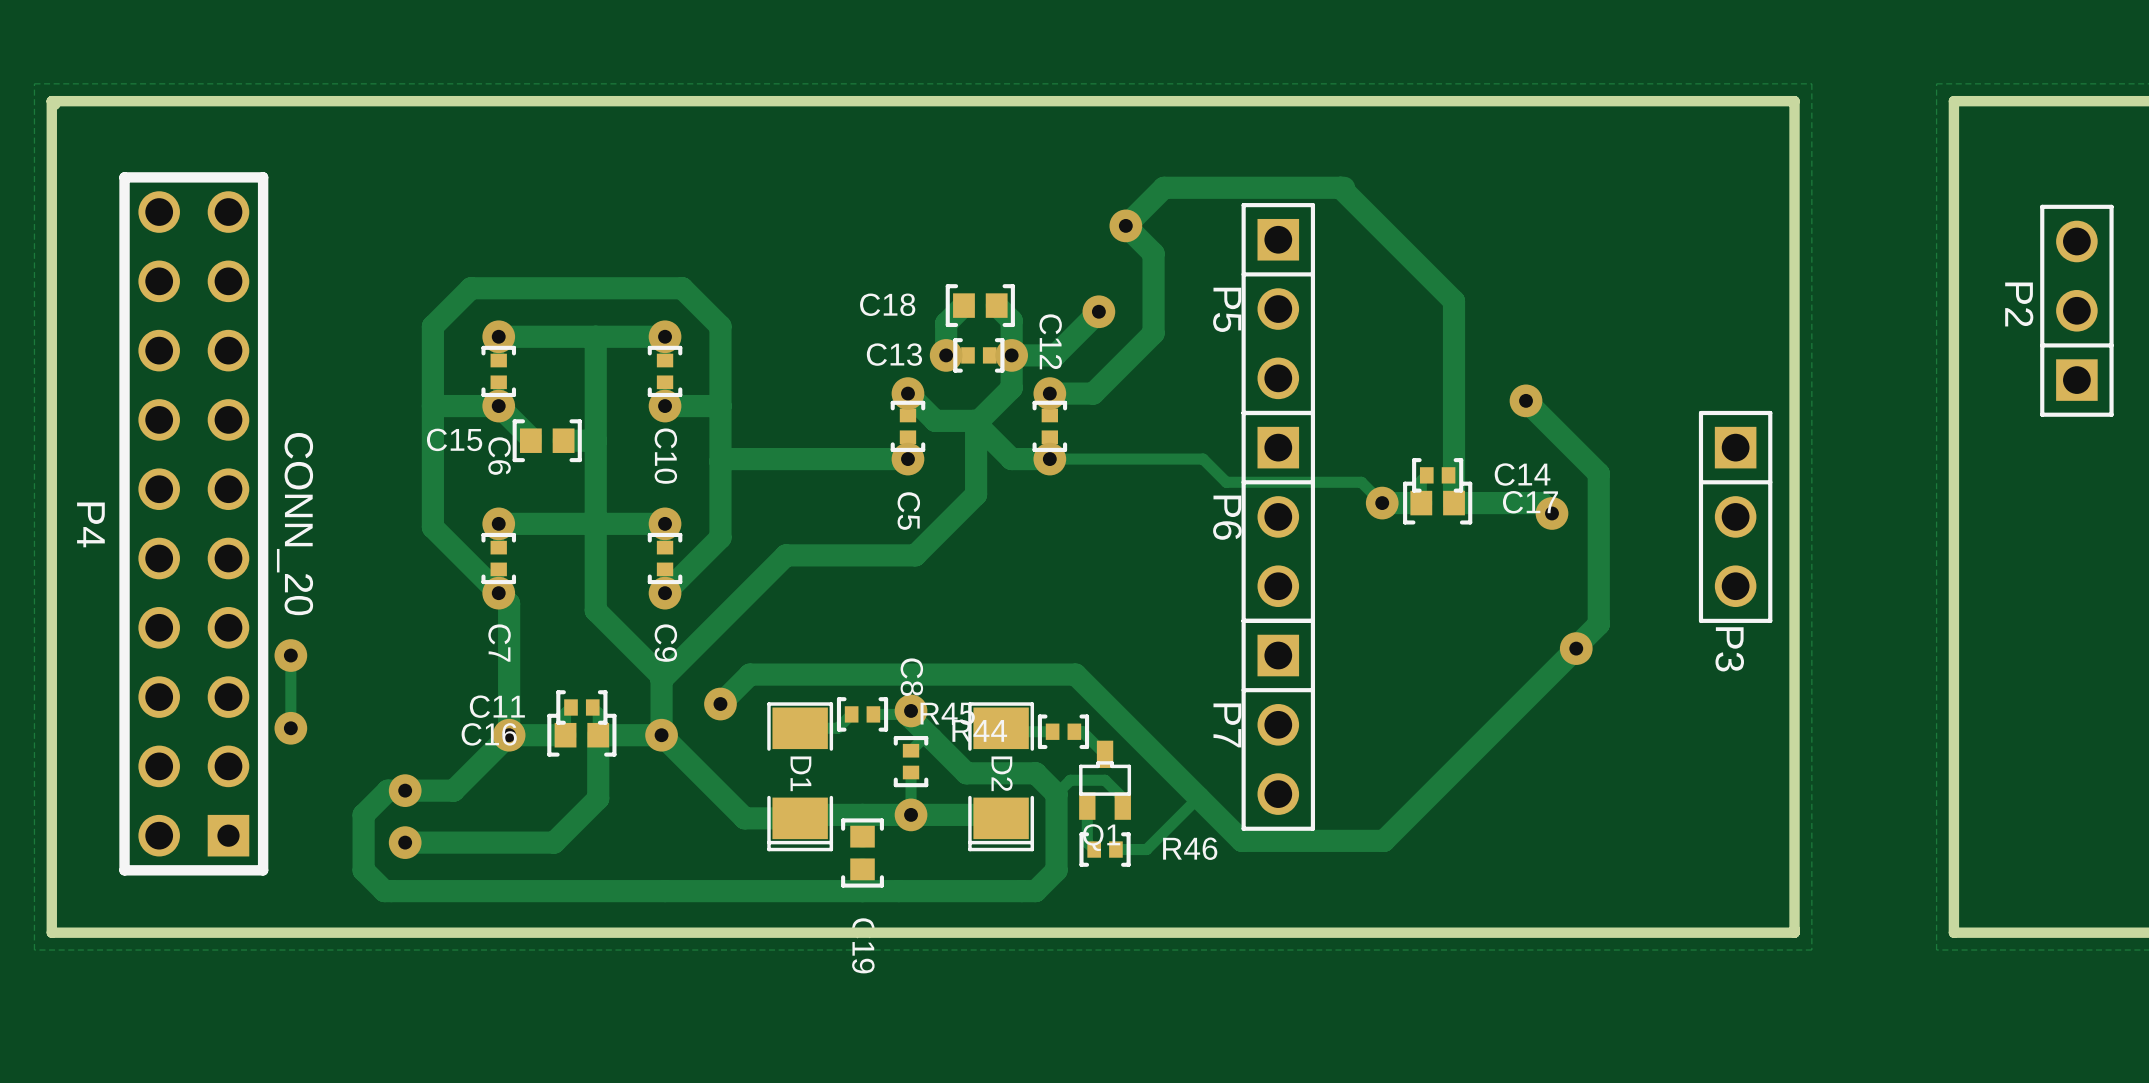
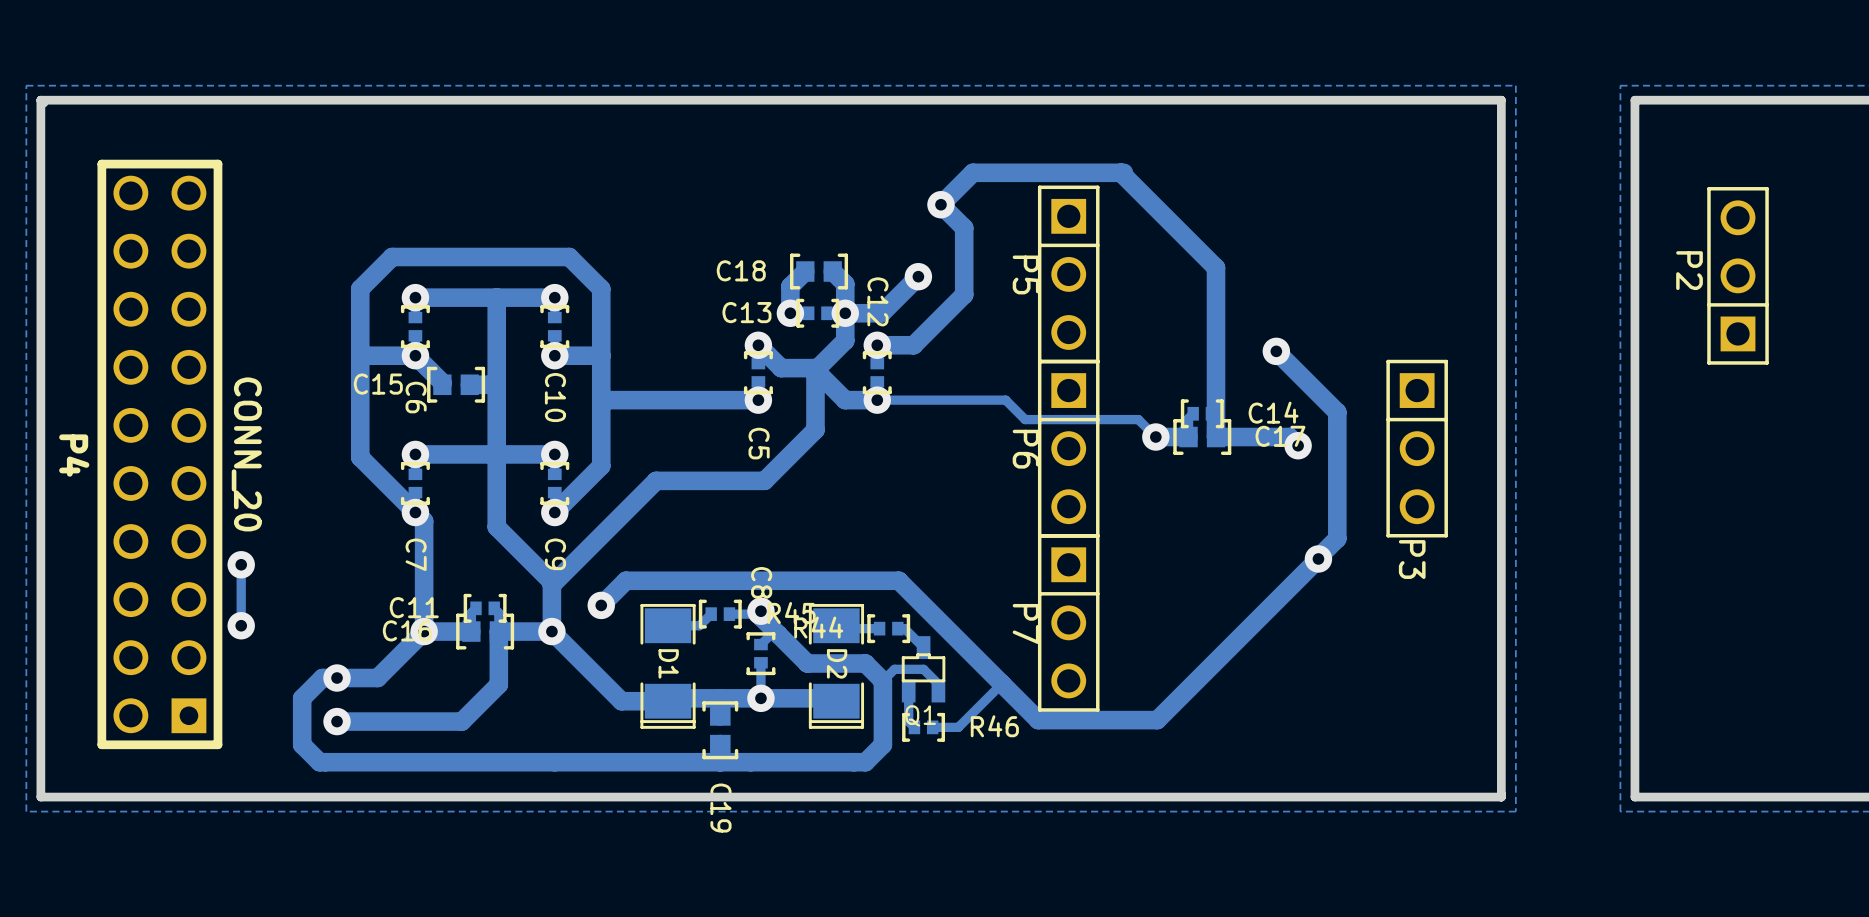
P3 position: (1735, 516) -> (1417, 448)

